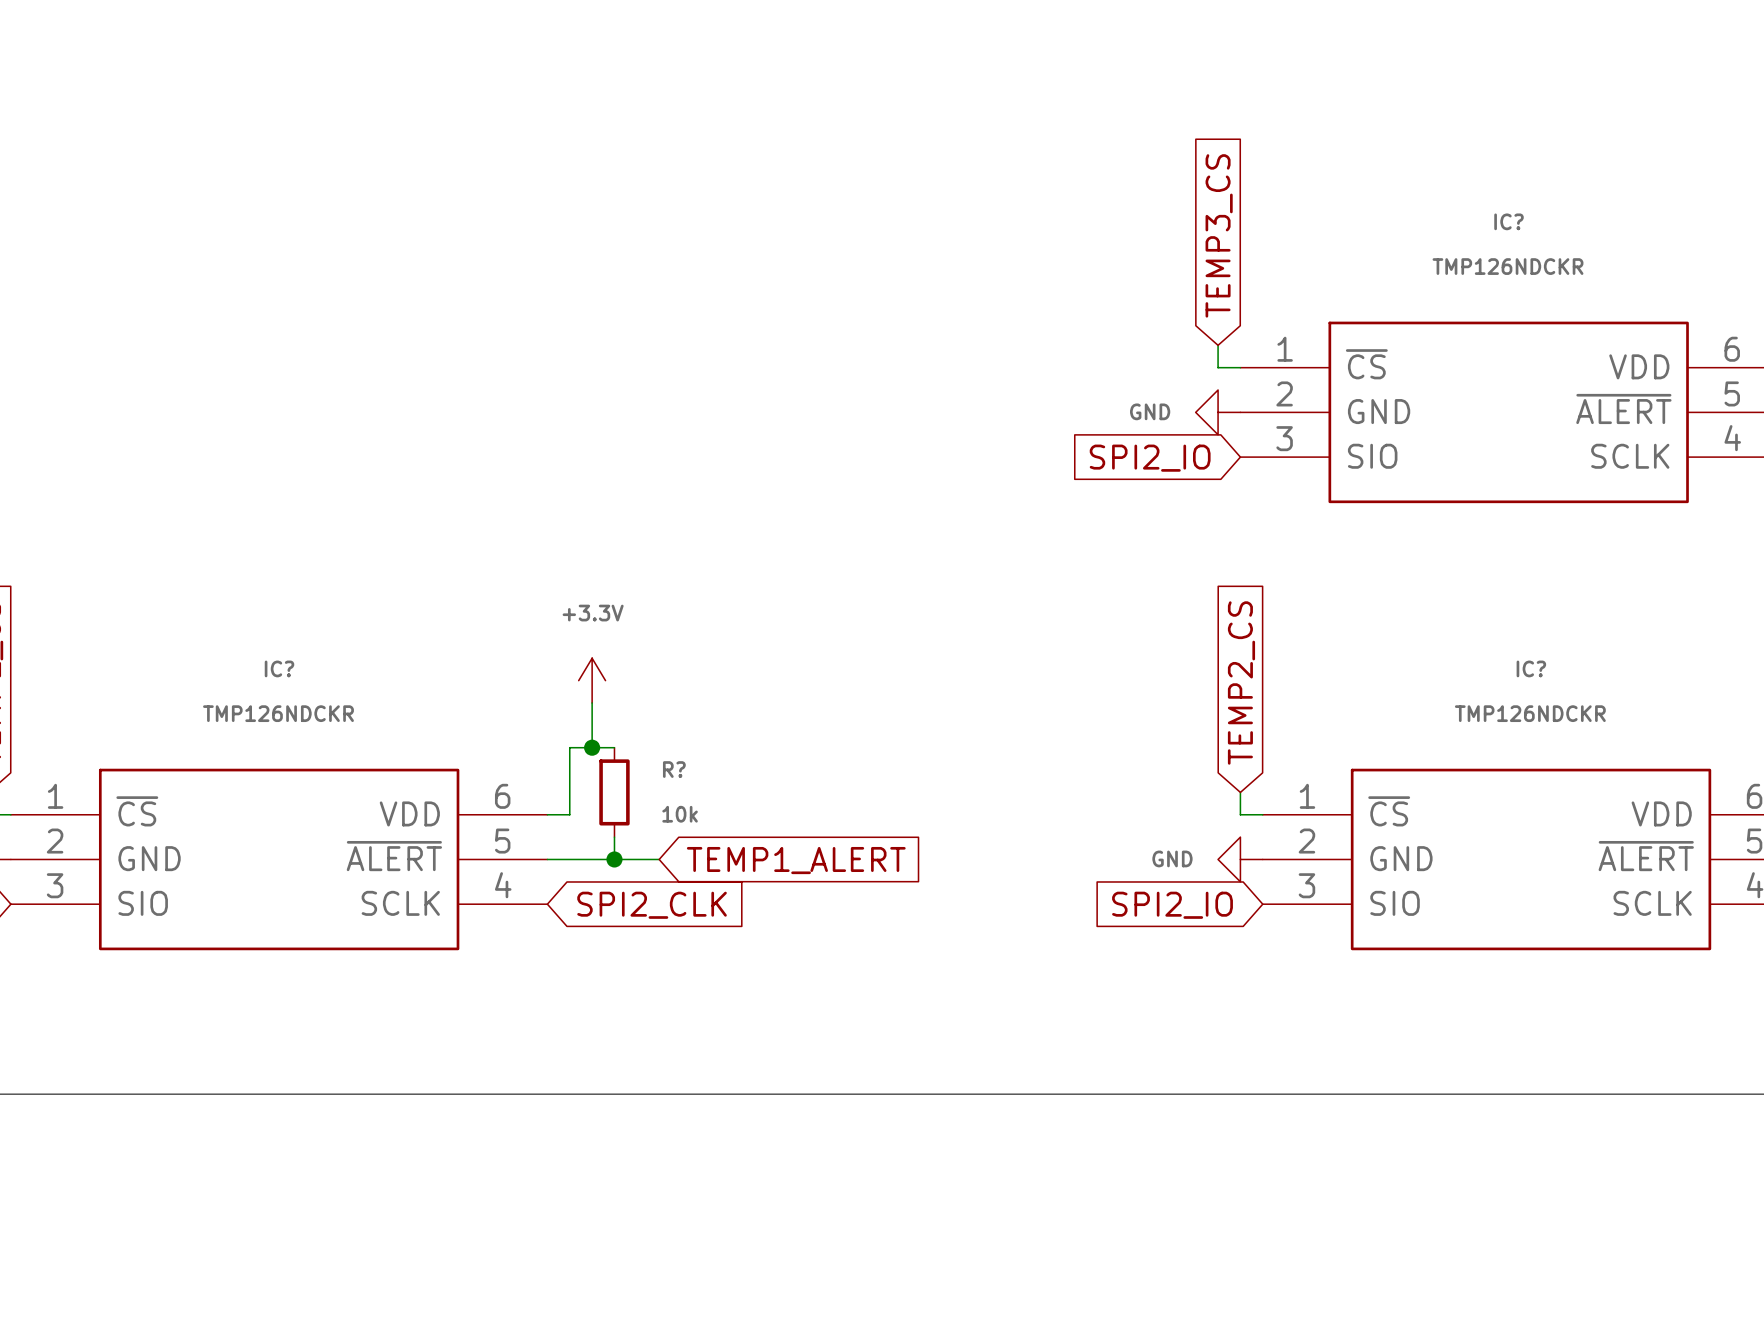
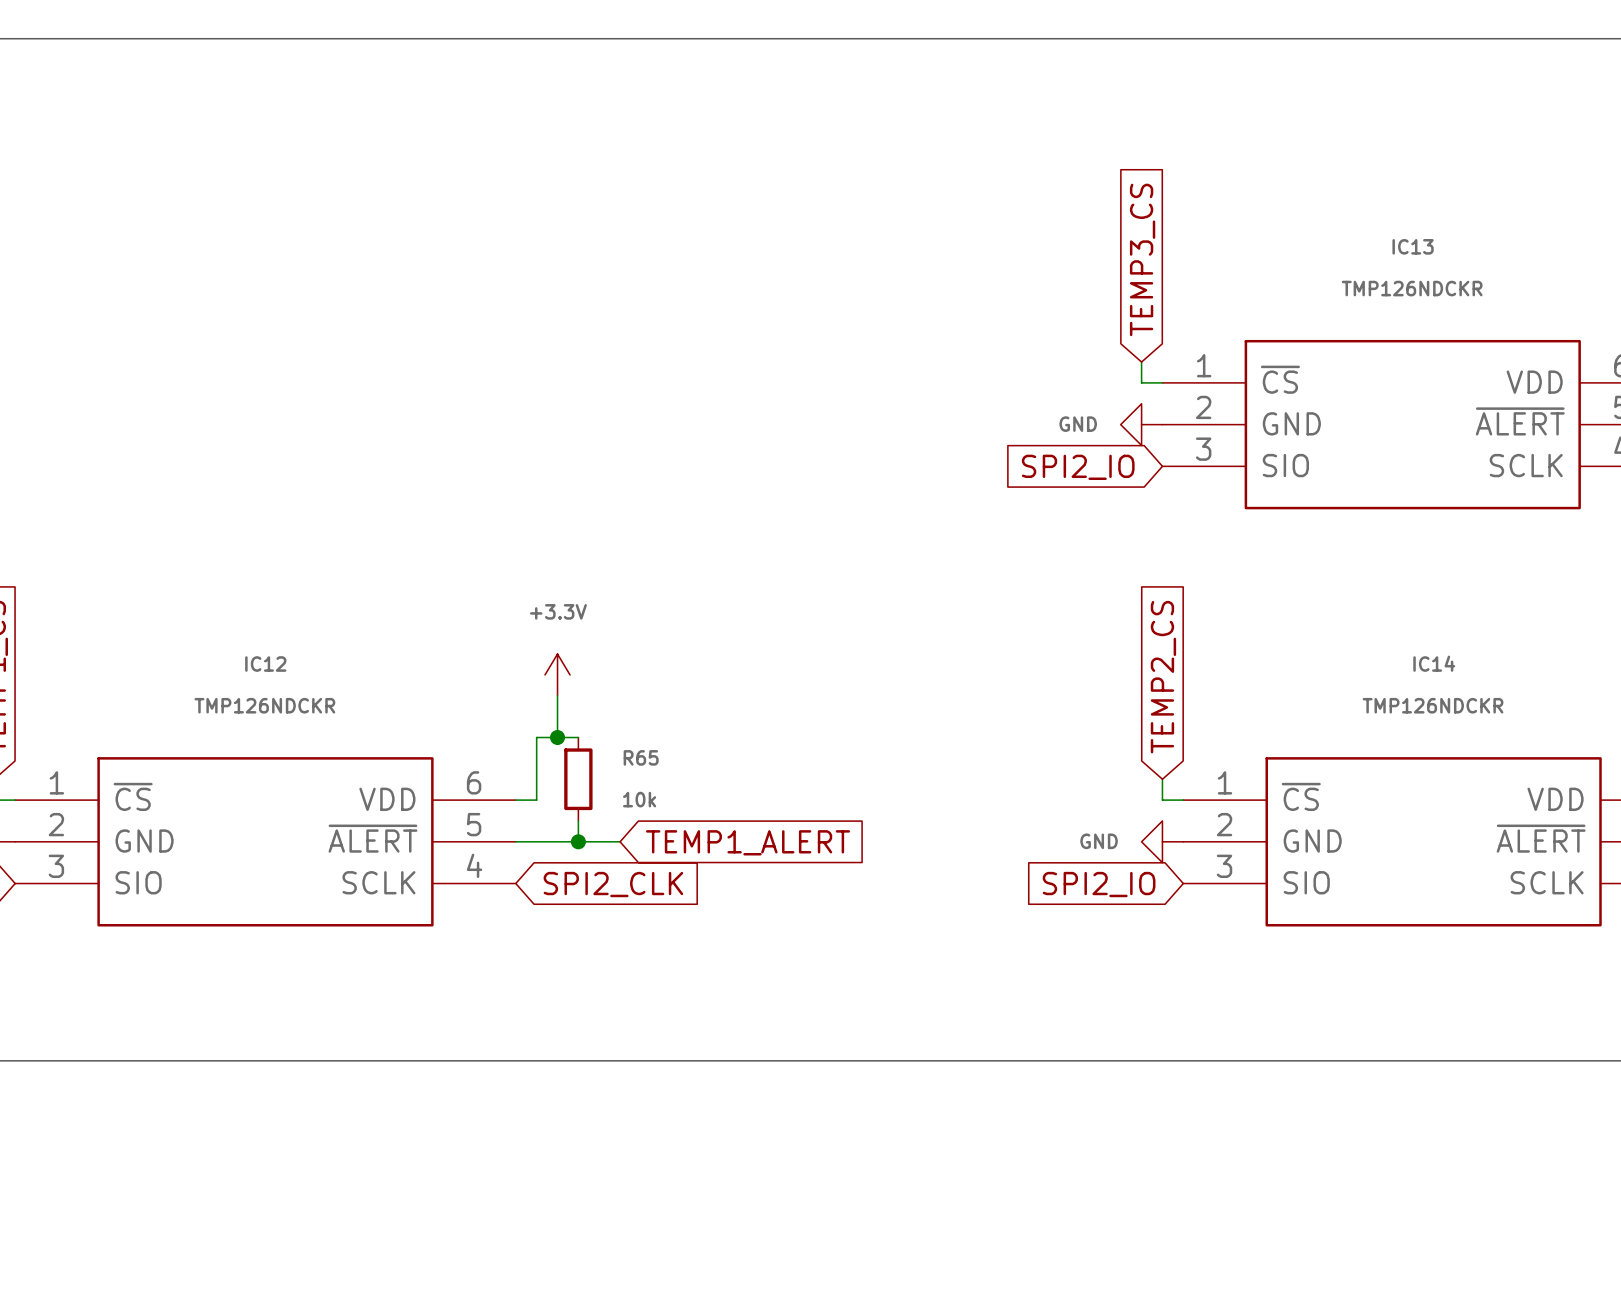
IC? name: IC? (1509, 221) -> IC13 (1413, 246)
IC? name: IC? (279, 668) -> IC12 (265, 664)
IC? name: IC? (1531, 668) -> IC14 (1434, 663)
R? name: R? (674, 769) -> R65 (641, 757)

